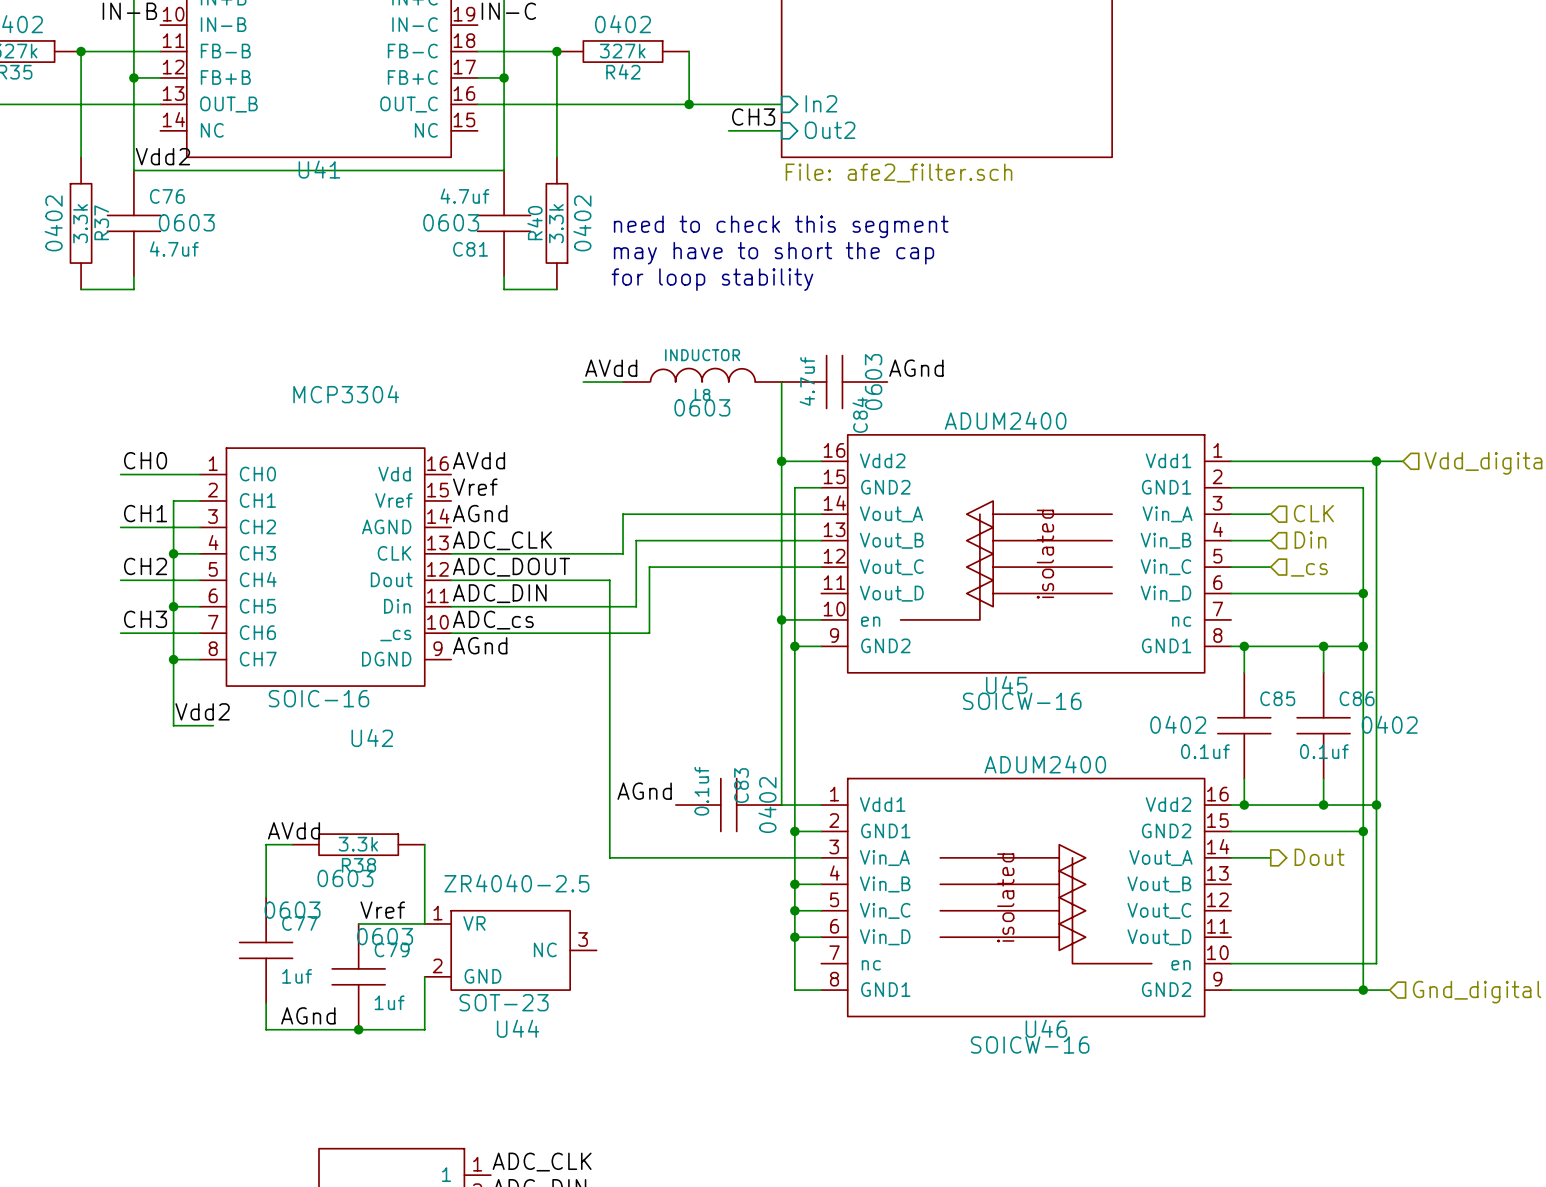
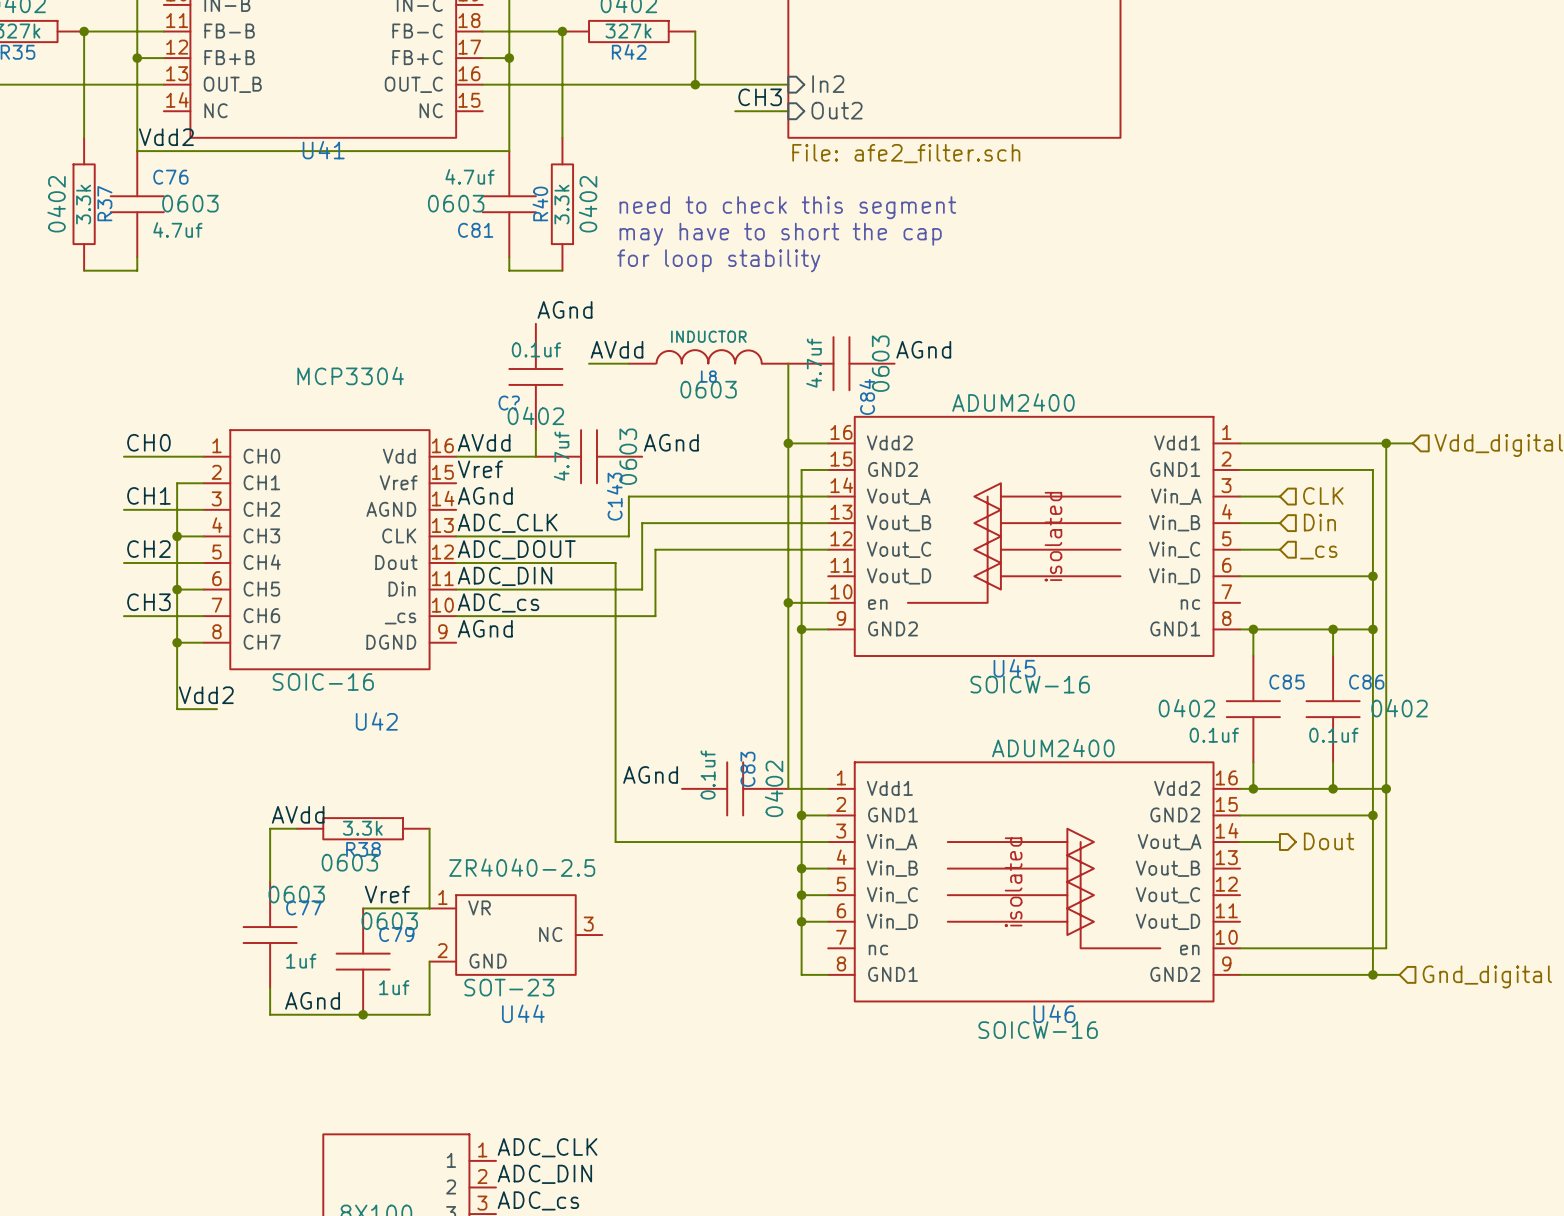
label: none -> AGnd (565, 309)
C?: none -> 0.1uf (535, 376)
wire: none -> (535, 430) (535, 456) (456, 456)
label: none -> AGnd (671, 442)
C143: none -> 4.7uf (589, 456)

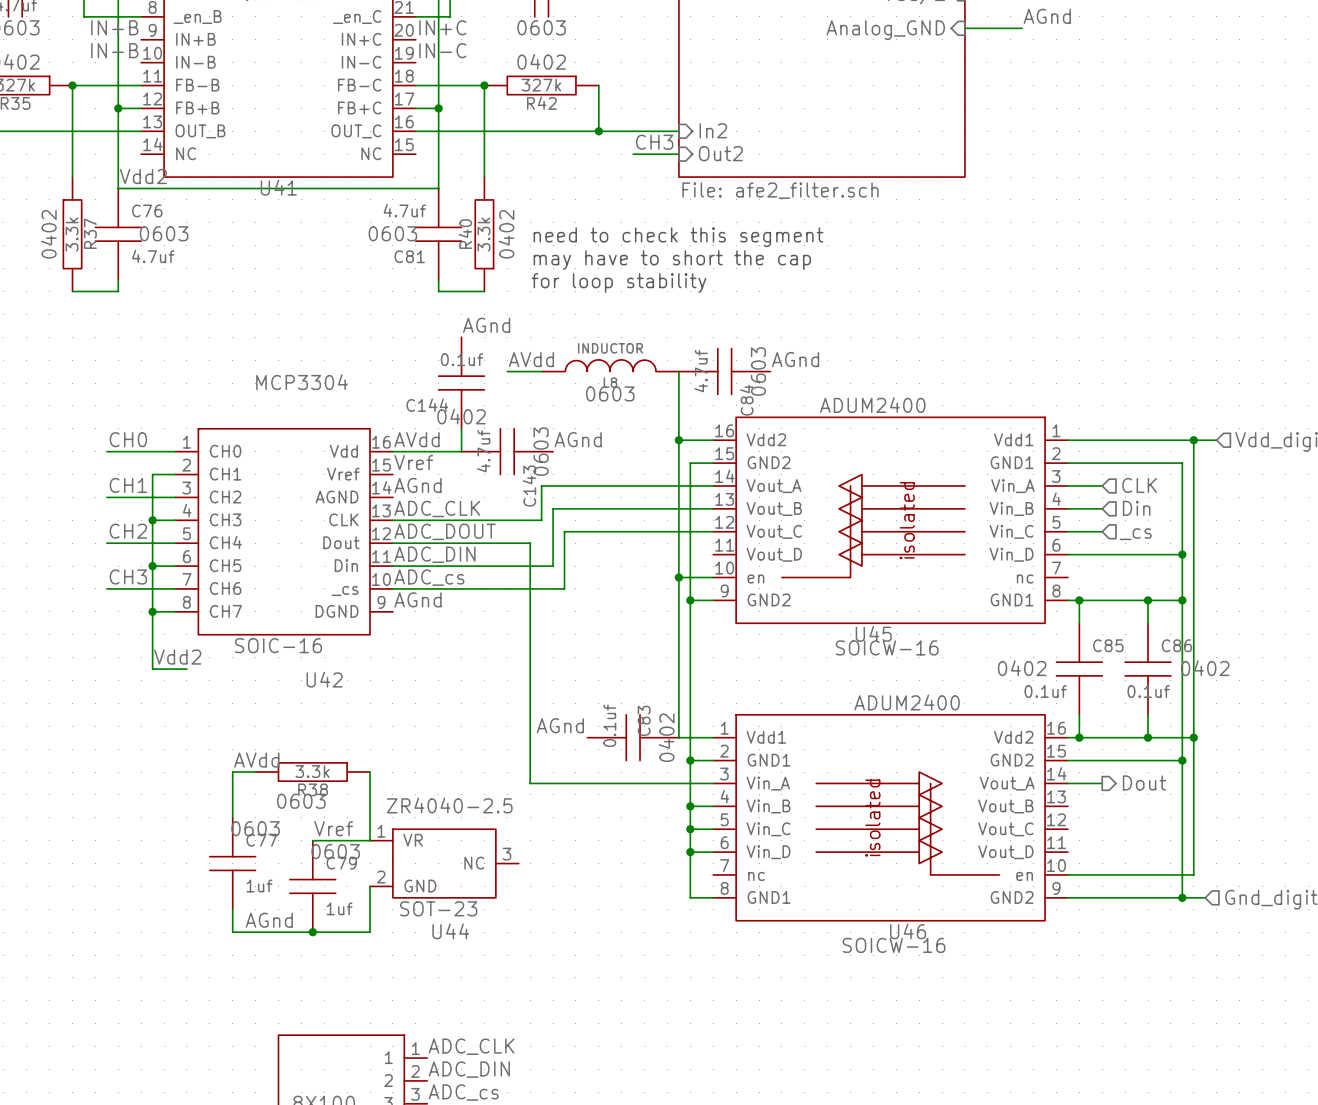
C? name: C? (509, 403) -> C144 (427, 405)

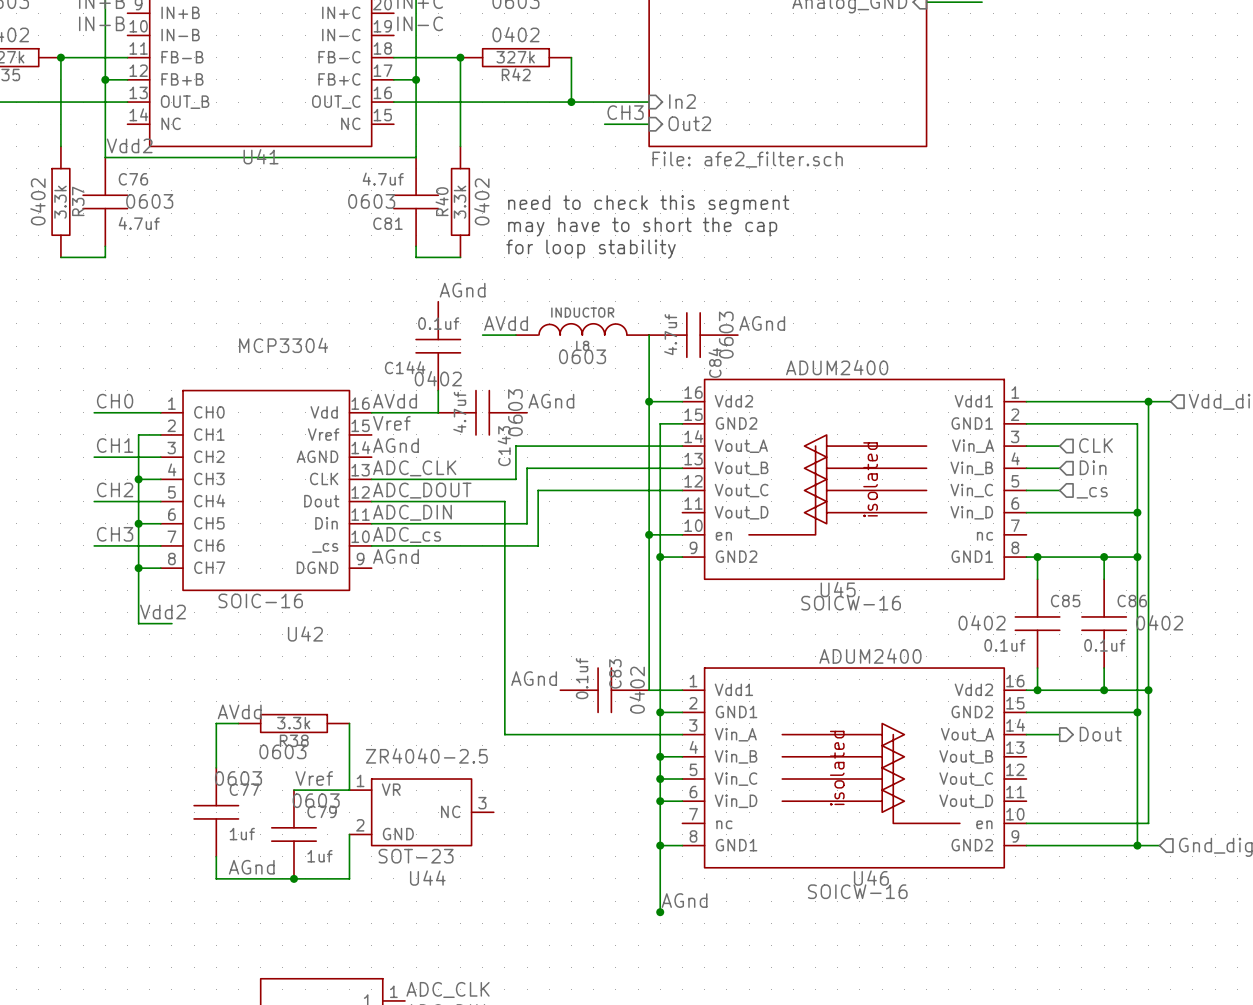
wire: none -> (660, 845) (660, 912)
junction: none -> (660, 845)
label: none -> AGnd (684, 900)
junction: none -> (660, 912)

